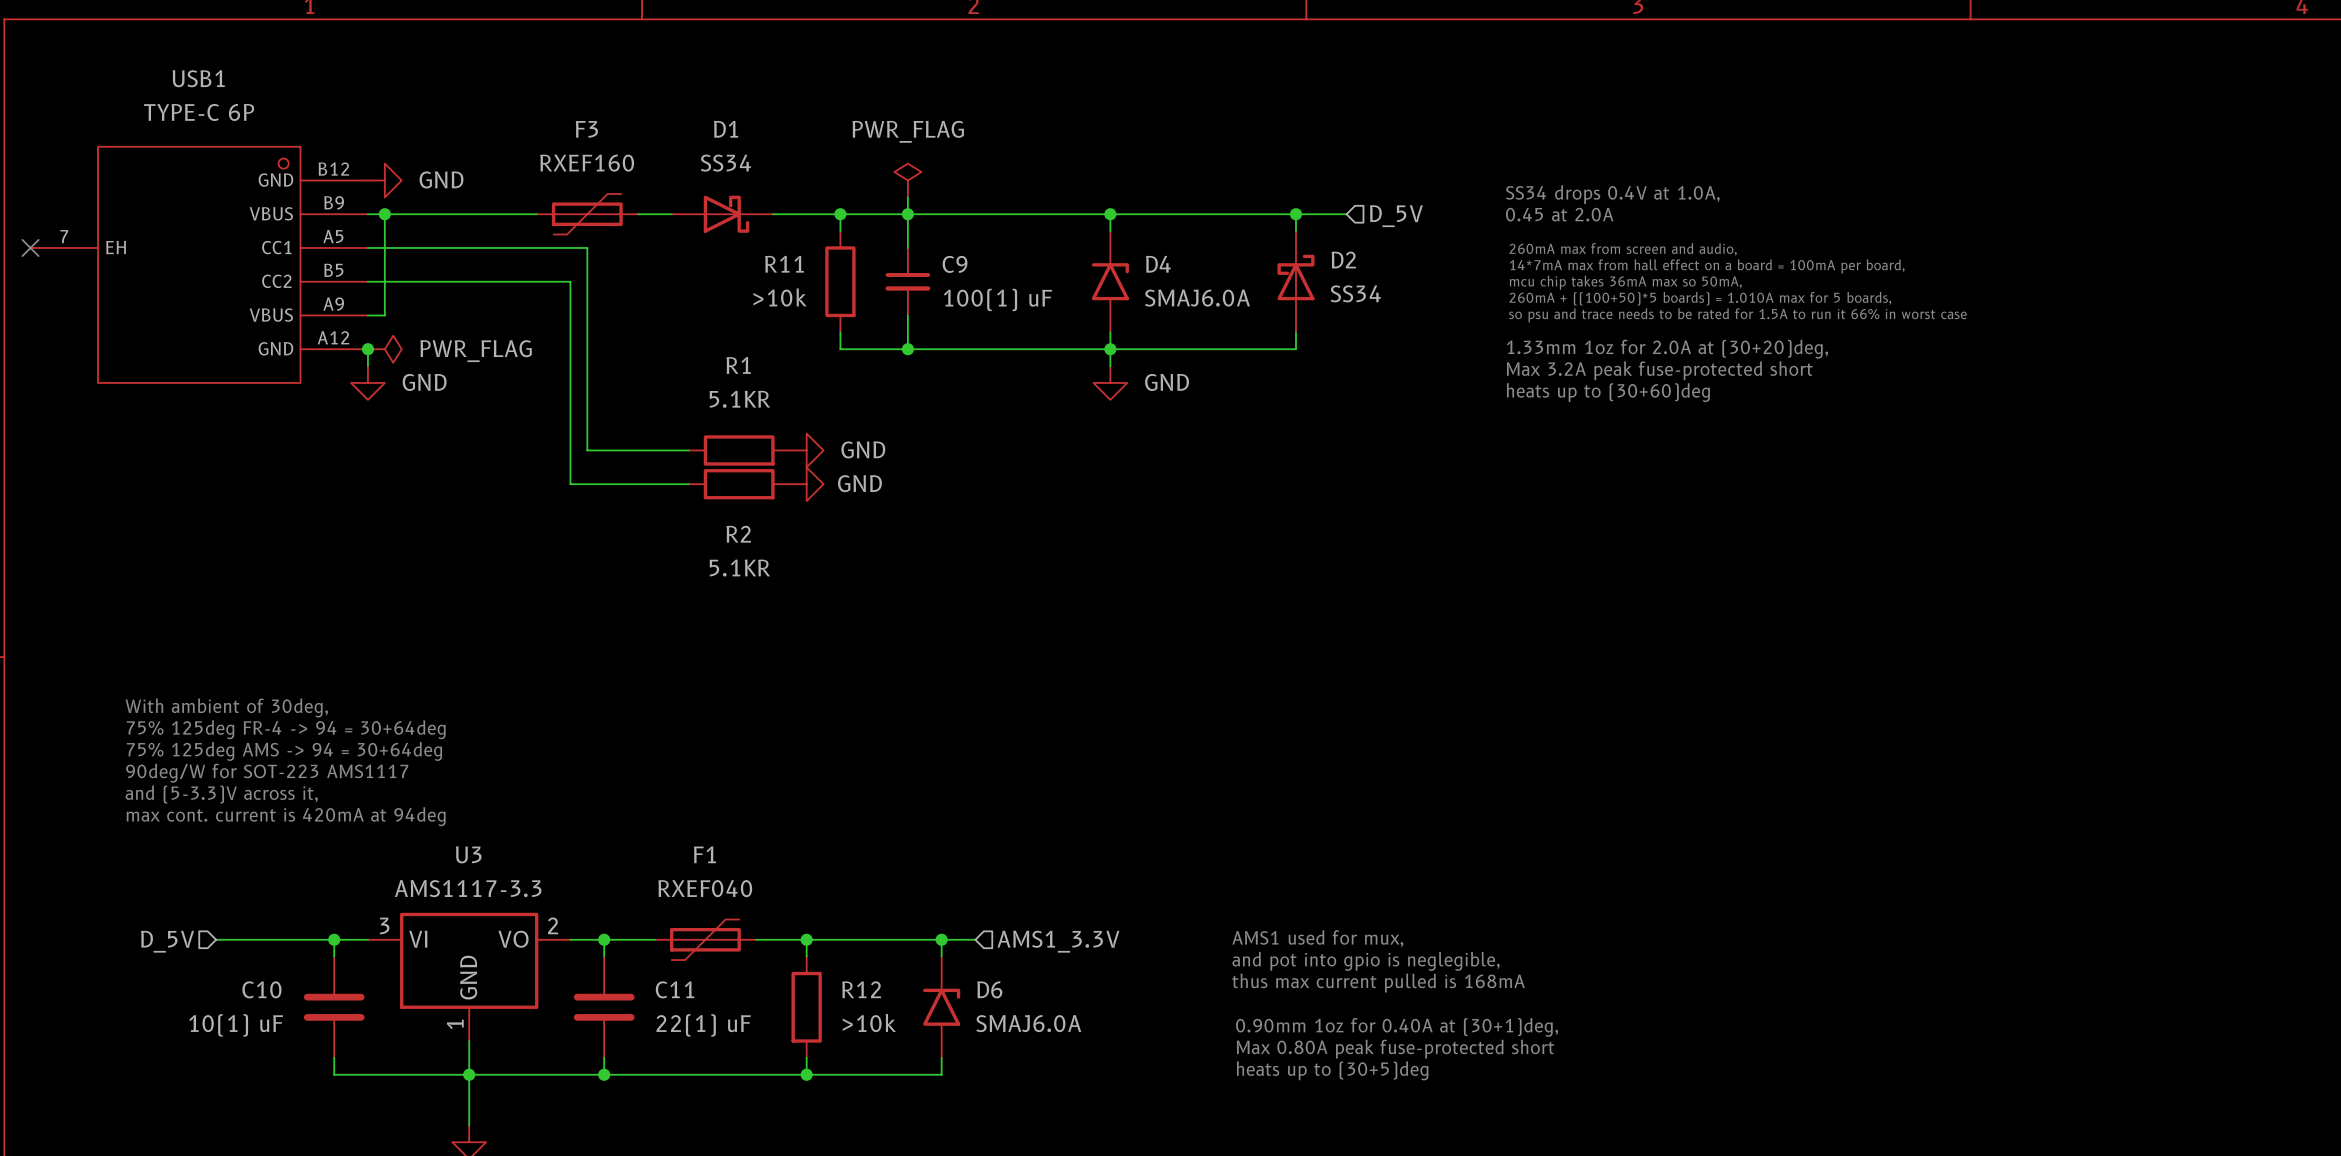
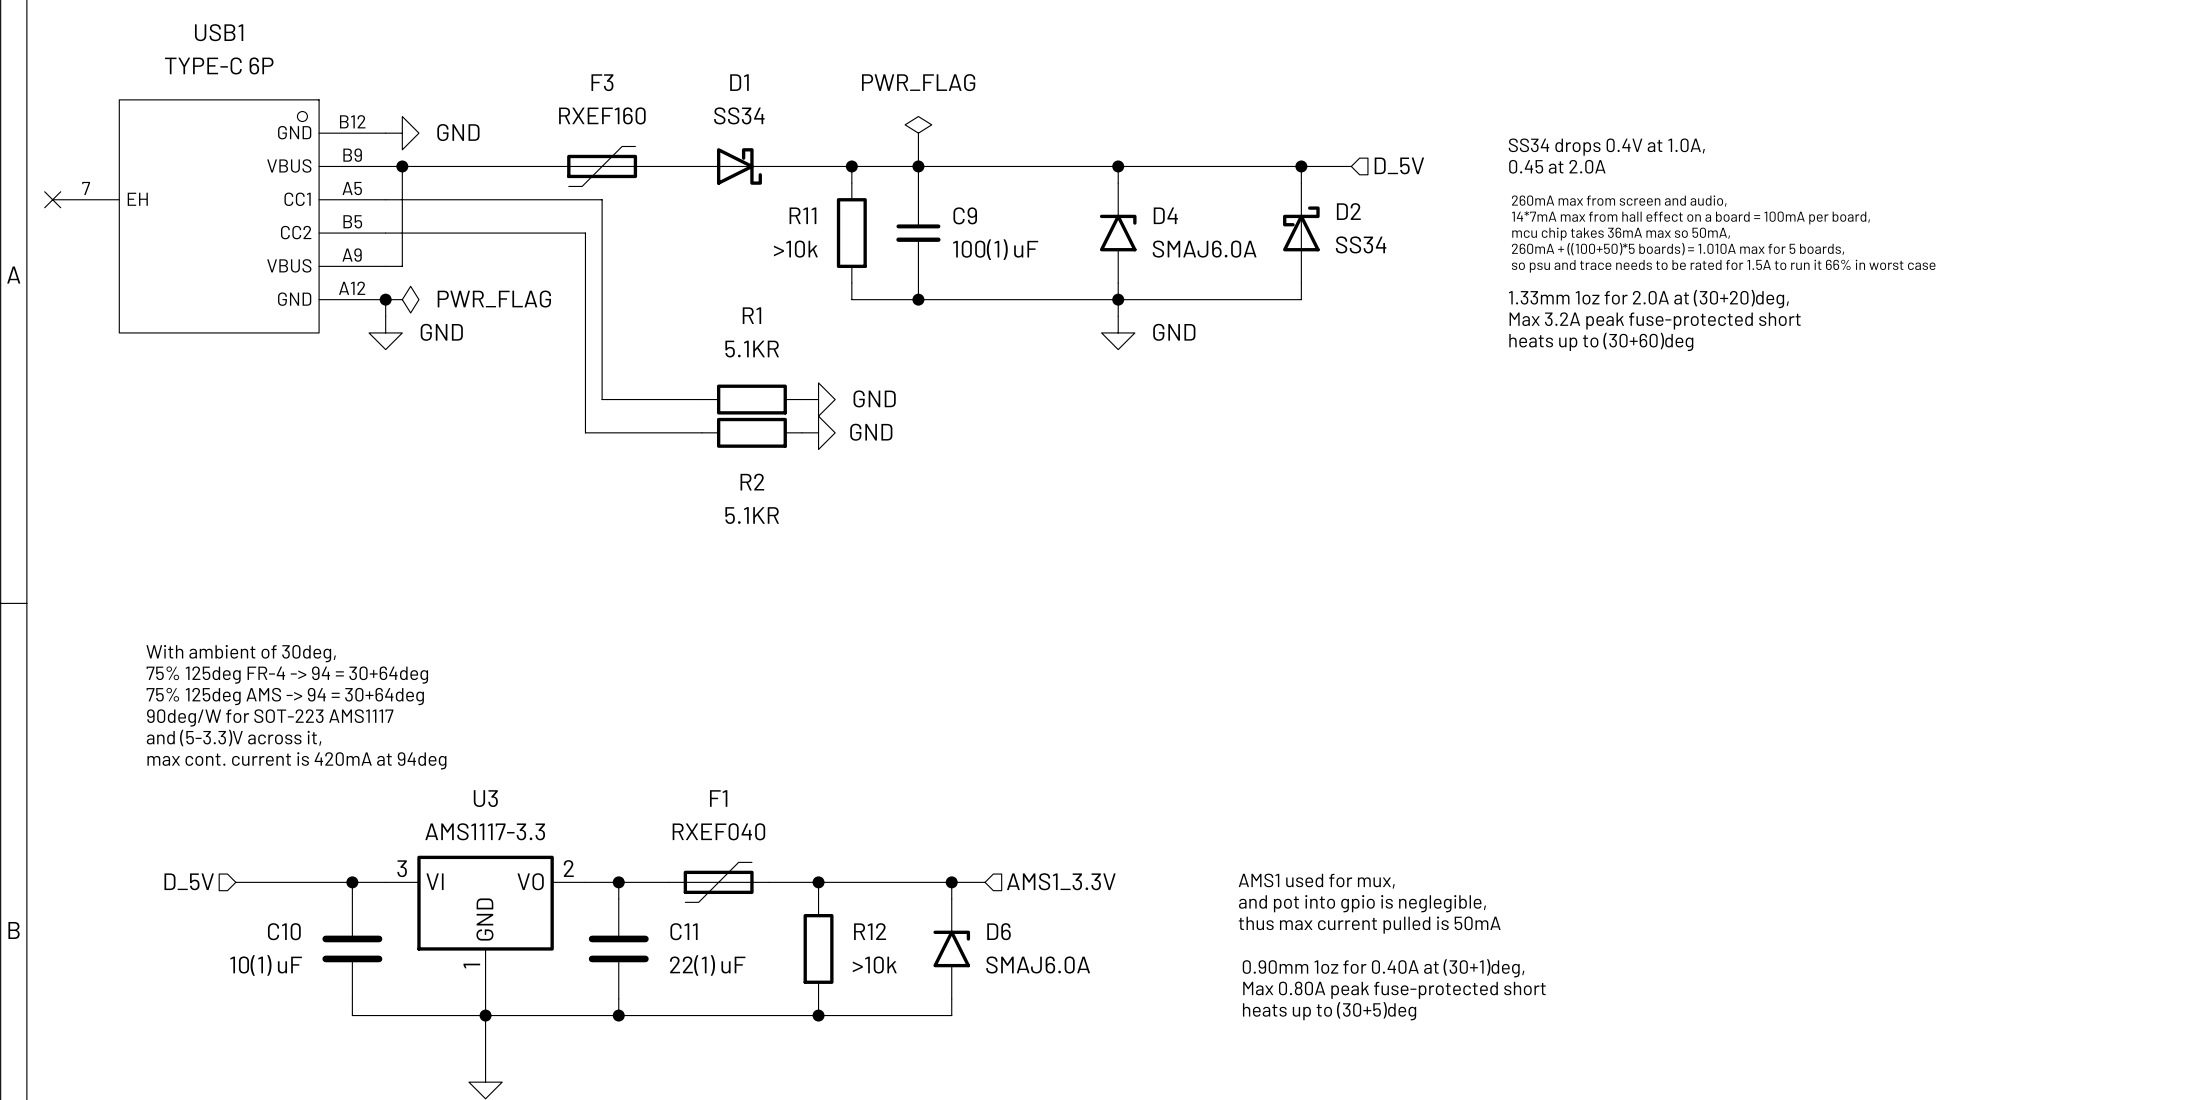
text: thus max current pulled is 168mA (1378, 983) -> thus max current pulled is 50mA (1369, 925)

